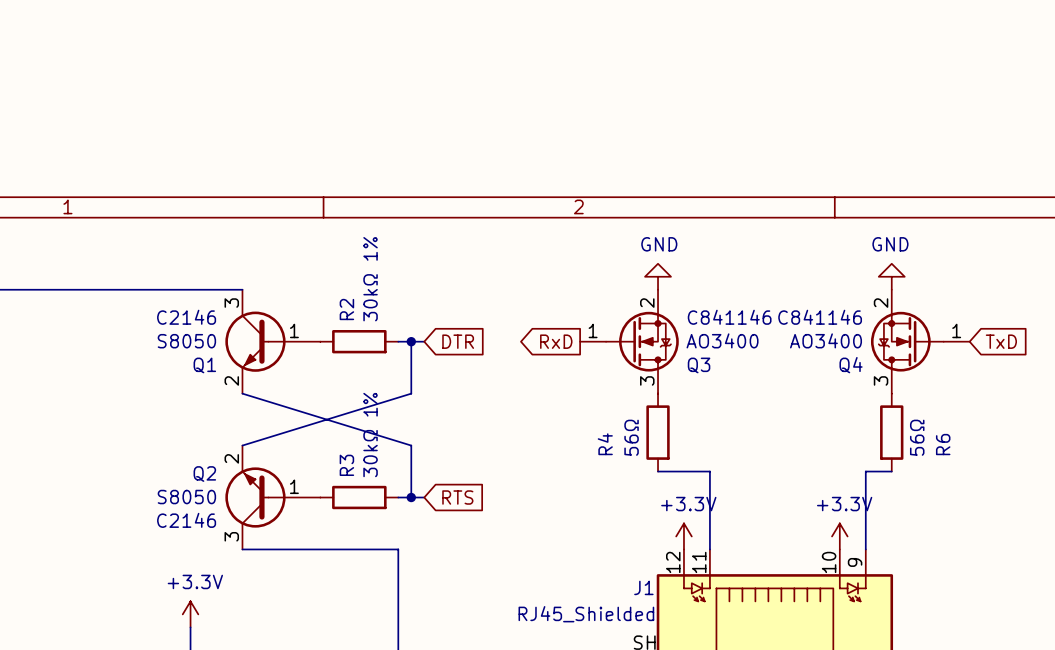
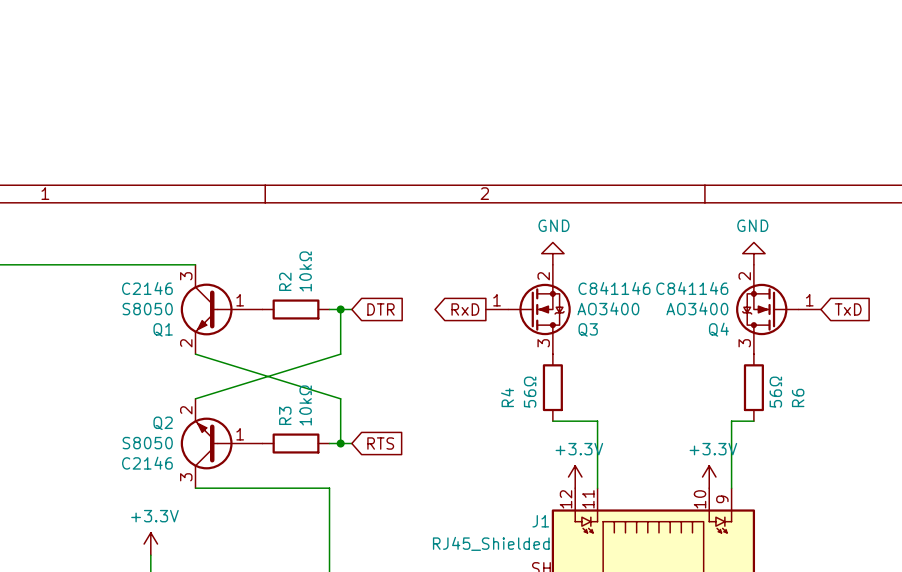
R2 value: 30kΩ 1% (370, 279) -> 10kΩ (305, 271)
R3 value: 30kΩ 1% (370, 435) -> 10kΩ (305, 405)

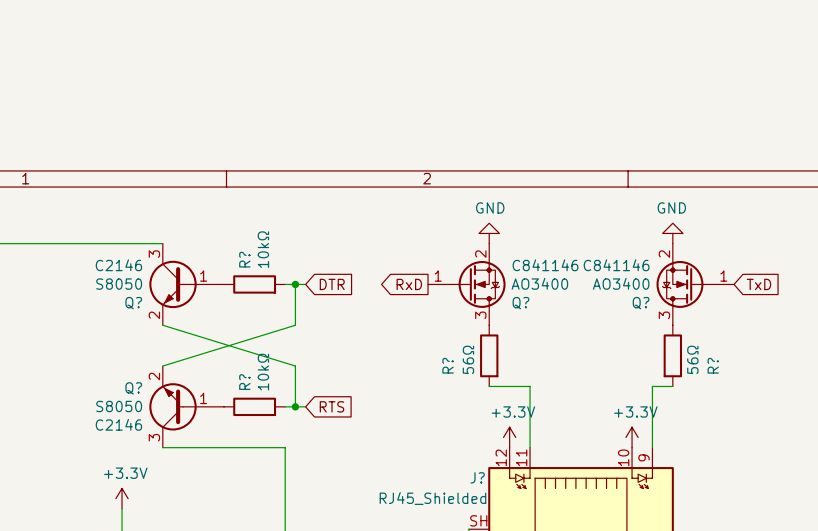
R2 name: R2 (285, 281) -> R? (244, 259)
Q1 name: Q1 (163, 329) -> Q? (133, 303)
Q3 name: Q3 (588, 329) -> Q? (520, 303)
Q4 name: Q4 (718, 329) -> Q? (641, 303)
R4 name: R4 (507, 397) -> R? (448, 365)
R6 name: R6 (798, 397) -> R? (713, 365)
R3 name: R3 (285, 415) -> R? (244, 382)
Q2 name: Q2 (163, 423) -> Q? (133, 388)
J1 name: J1 (540, 521) -> J? (477, 477)

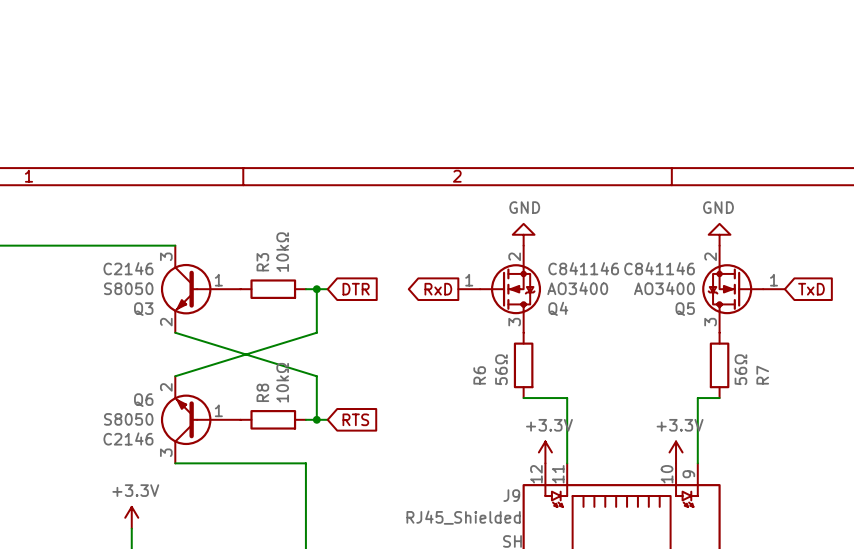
R? name: R? (244, 259) -> R3 (262, 262)
Q? name: Q? (133, 303) -> Q3 (143, 309)
Q? name: Q? (520, 303) -> Q4 (558, 308)
Q? name: Q? (641, 303) -> Q5 (685, 309)
R? name: R? (448, 365) -> R6 (479, 375)
R? name: R? (713, 365) -> R7 (762, 375)
R? name: R? (244, 382) -> R8 (262, 392)
Q? name: Q? (133, 388) -> Q6 (143, 400)
J? name: J? (477, 477) -> J9 (511, 495)

